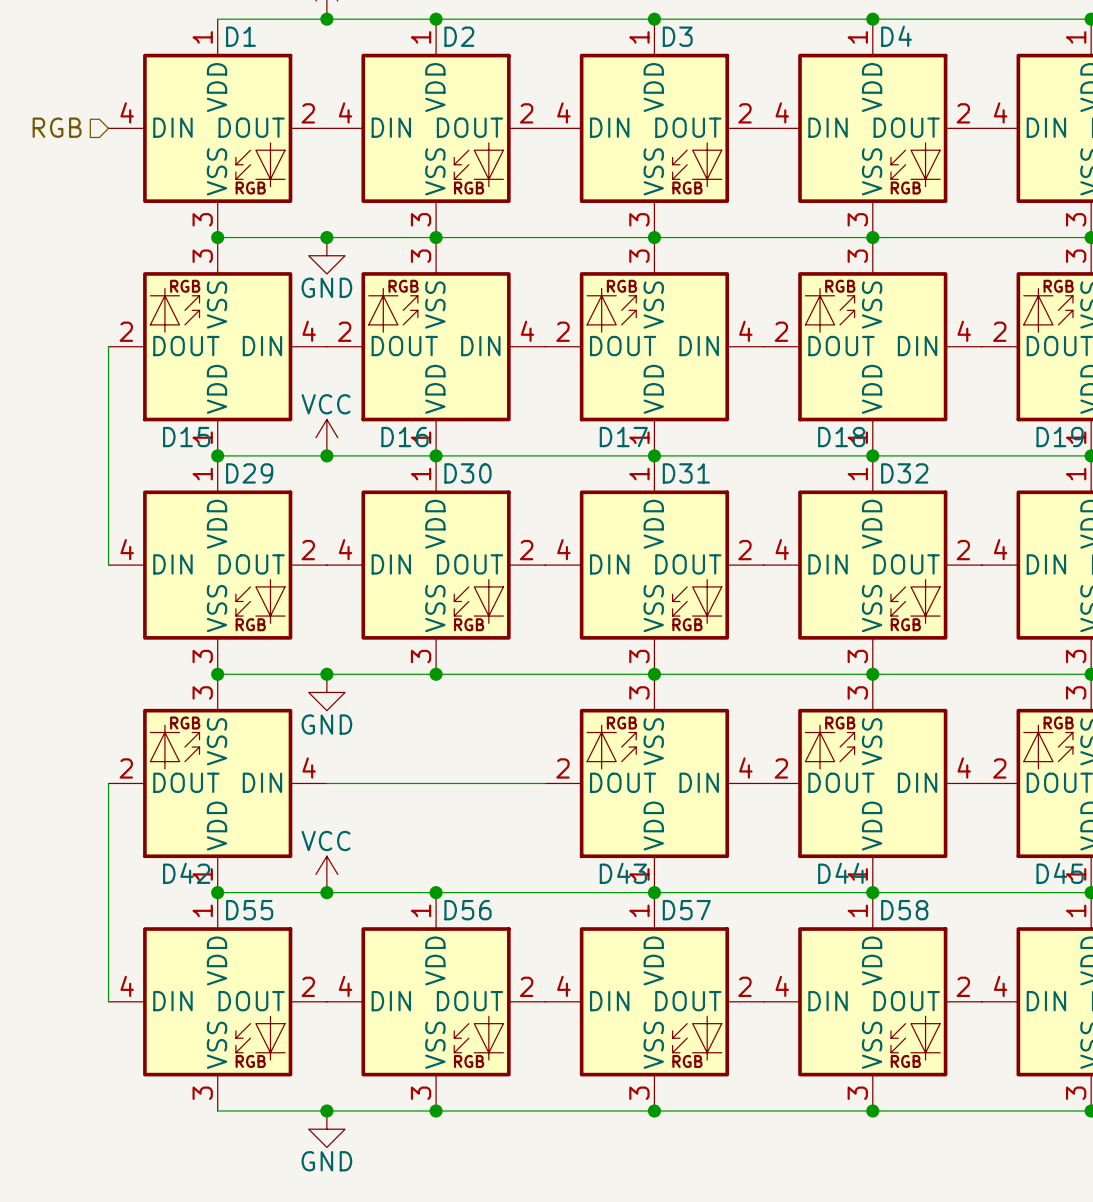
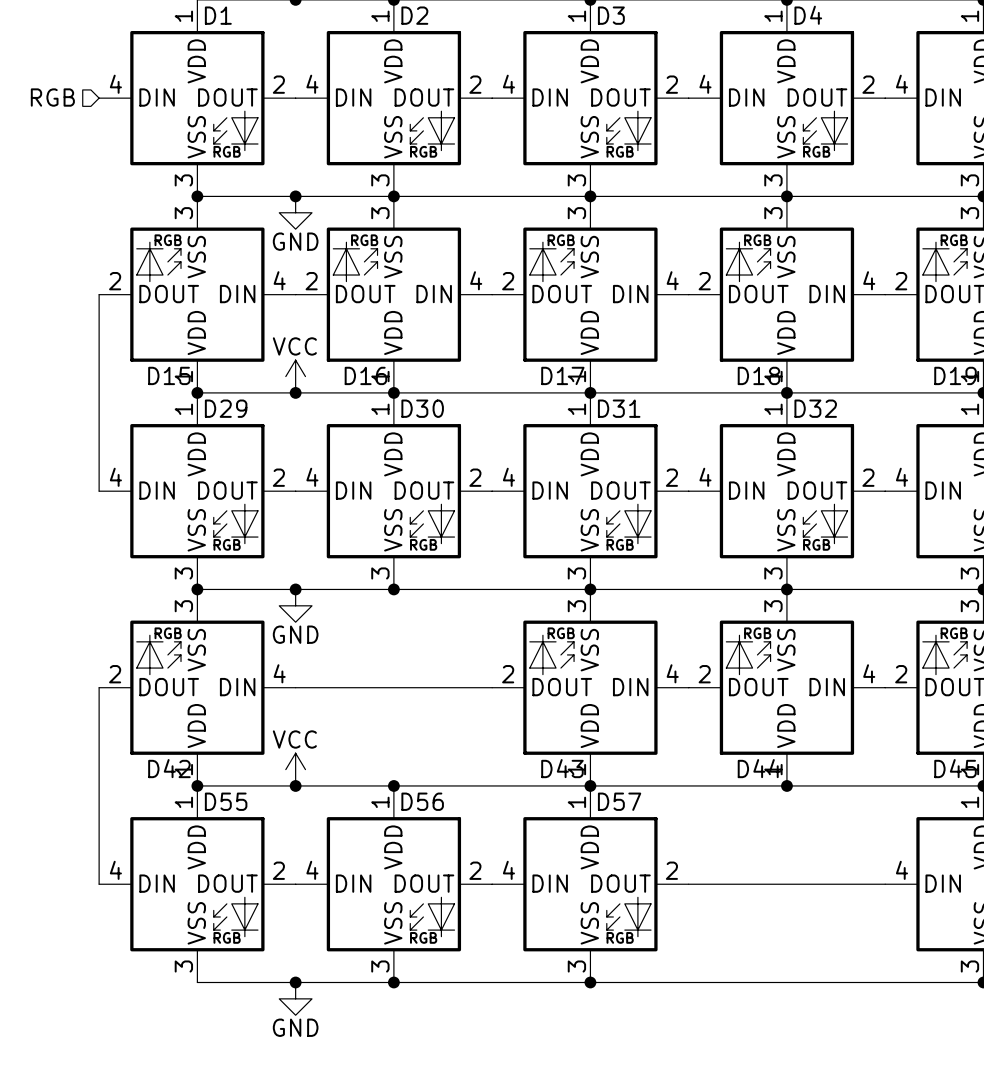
D58: (872, 1001) -> none
junction: (872, 1111) -> none

